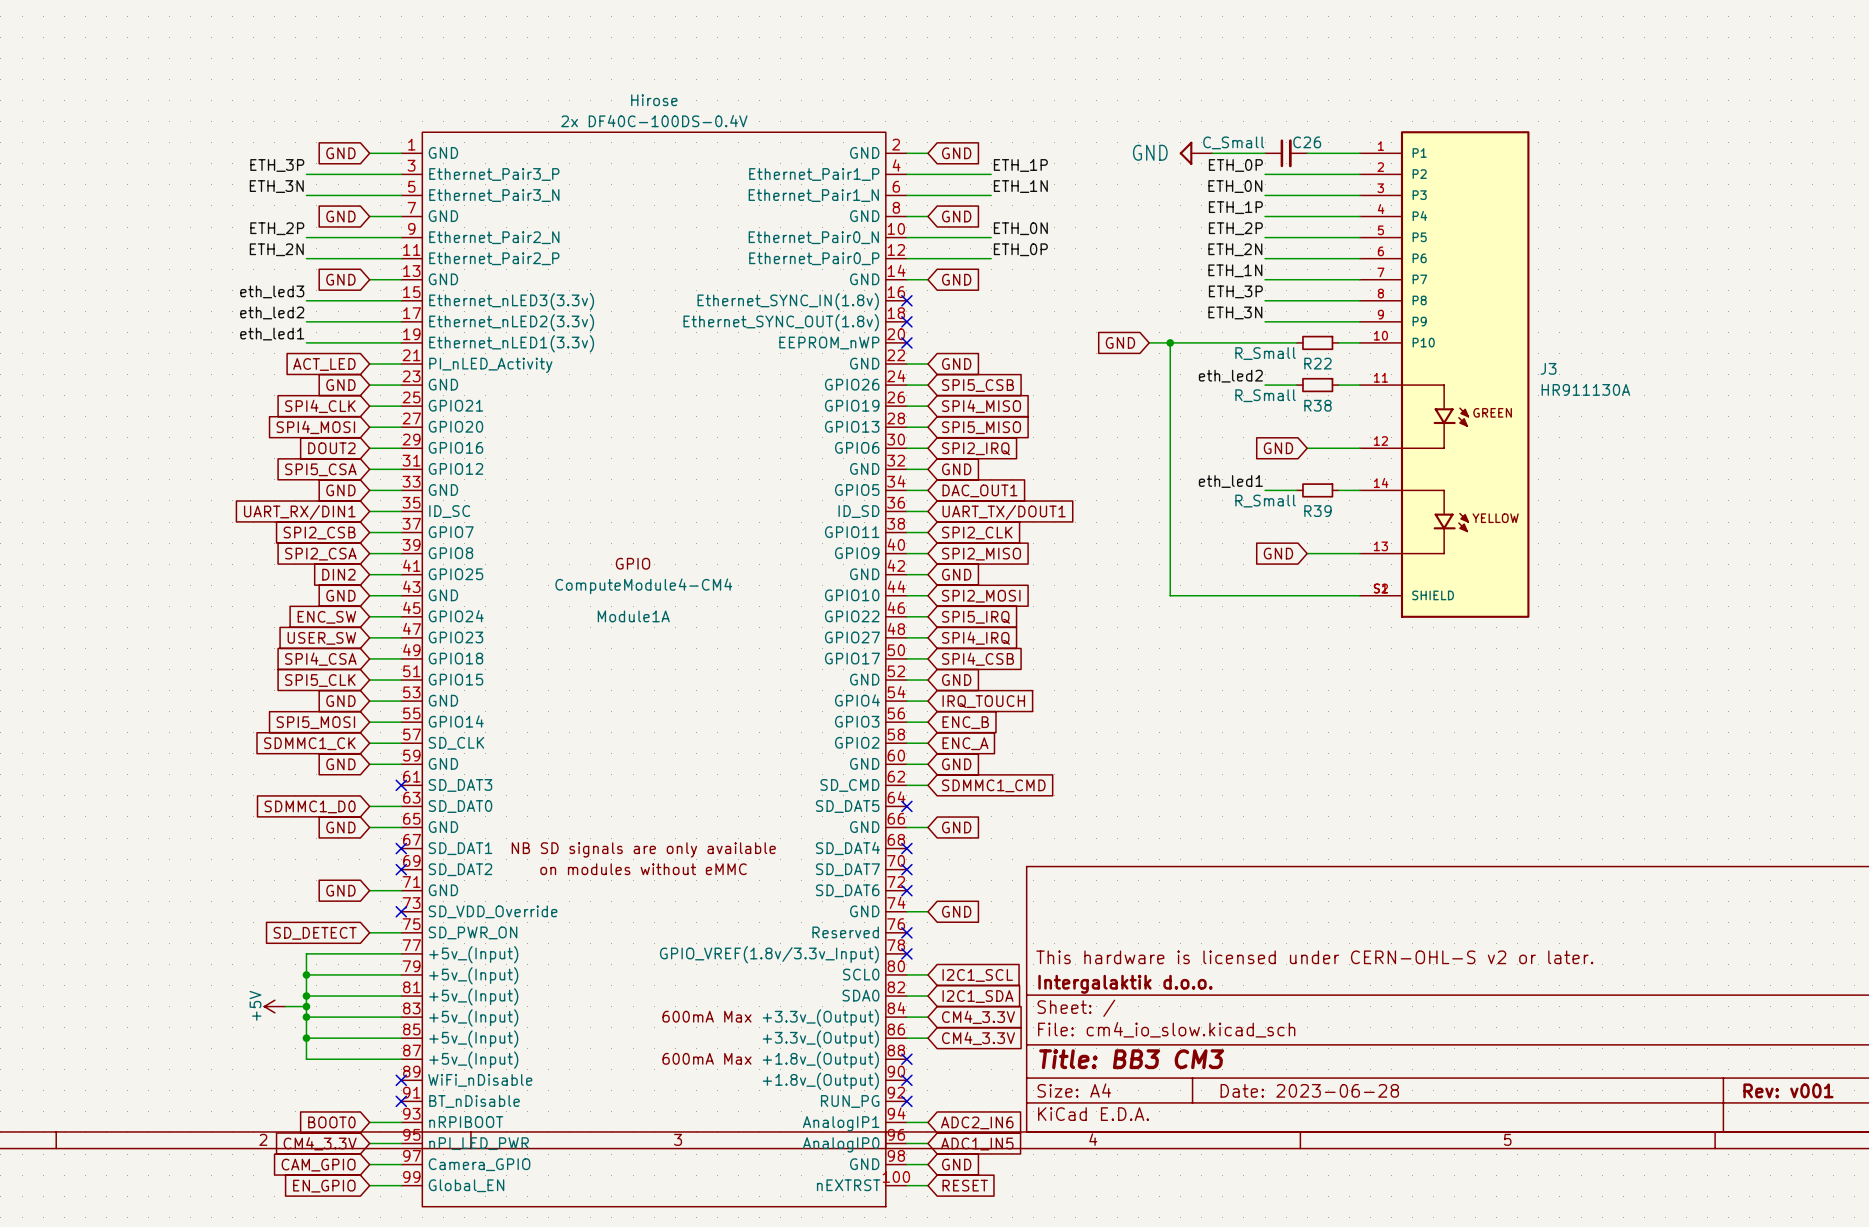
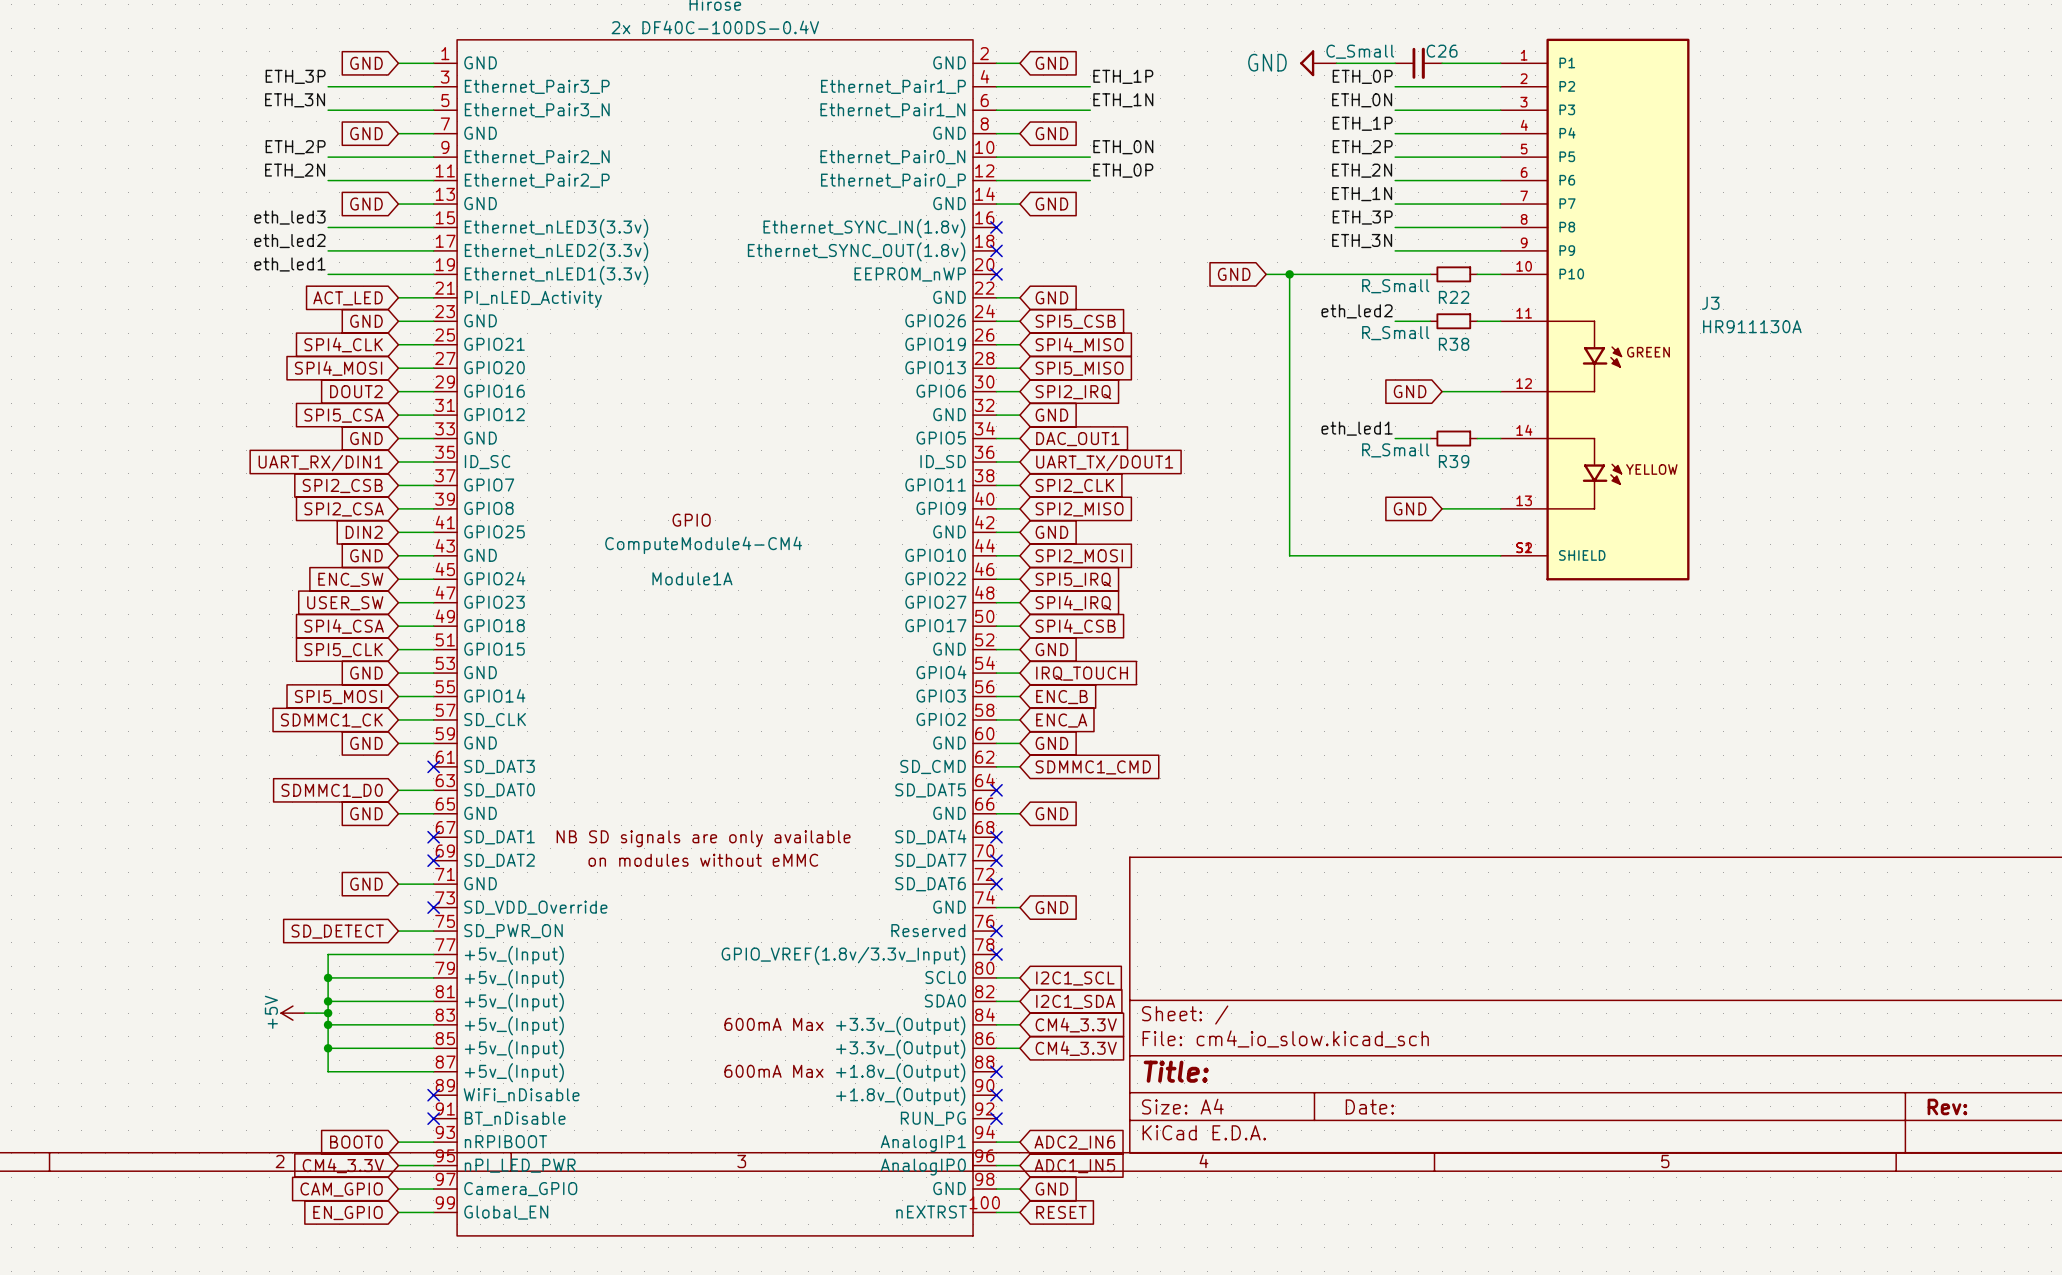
title block: This hardware is licensed under CERN-OHL-S v2 or later. (1314, 957) -> none
title block: Intergalaktik d.o.o. (1125, 984) -> none
title block: Title: BB3 CM3 (1131, 1059) -> Title: (1176, 1071)
title block: Date: 2023-06-28 (1309, 1090) -> Date: (1369, 1106)
title block: Rev: v001 (1788, 1090) -> Rev: (1947, 1106)

